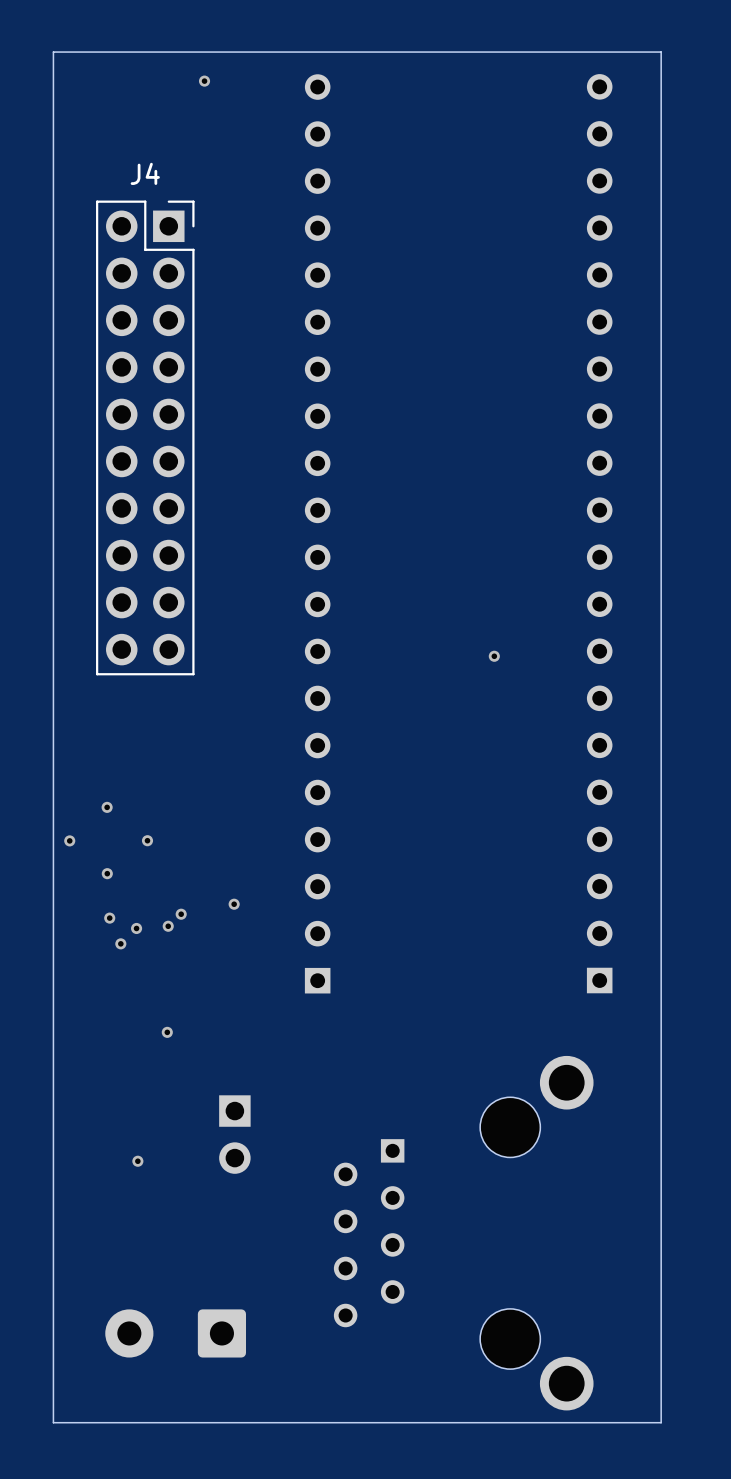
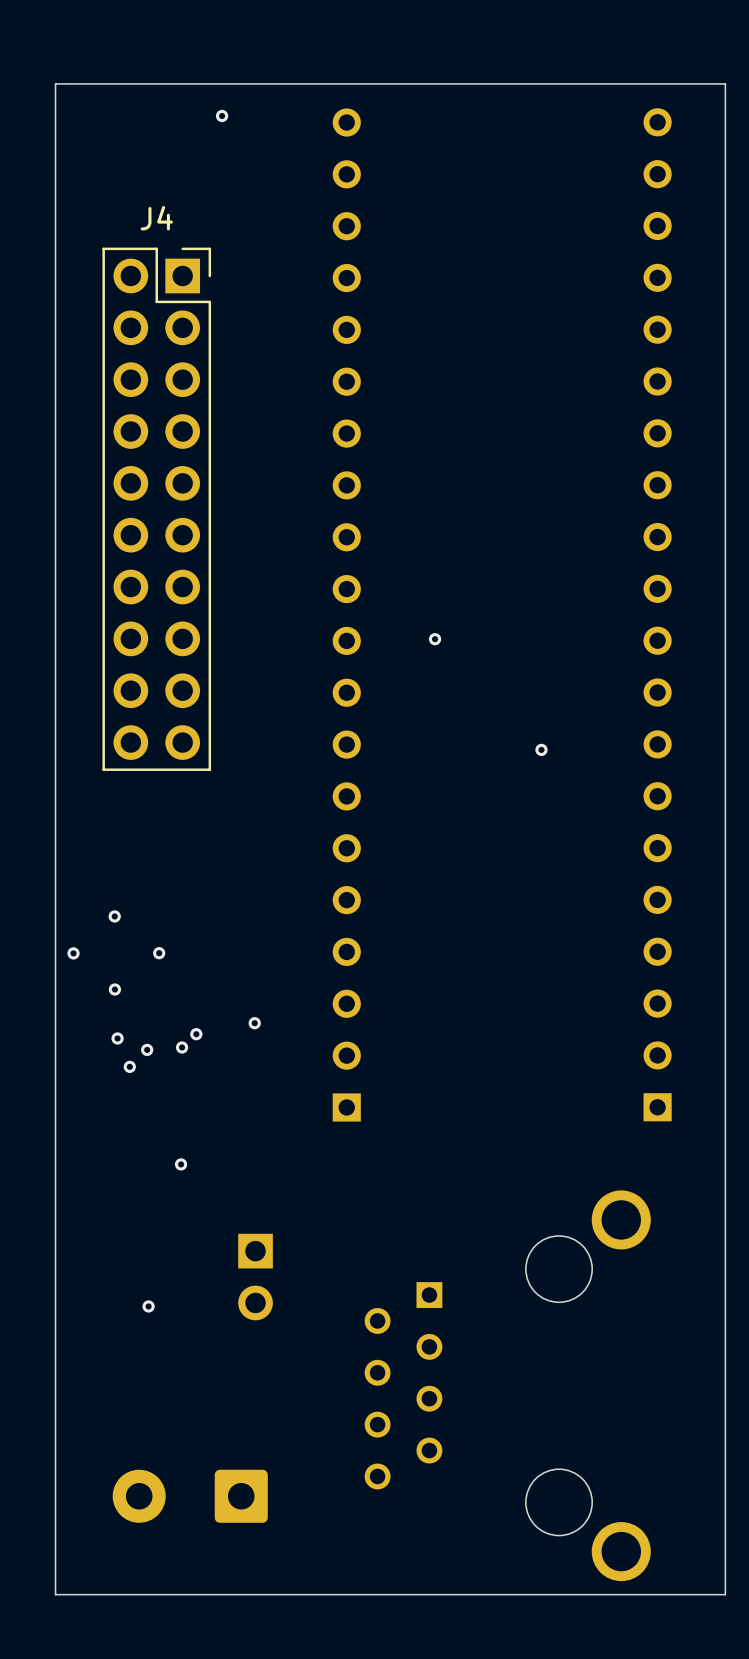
via: none -> (435, 639)

